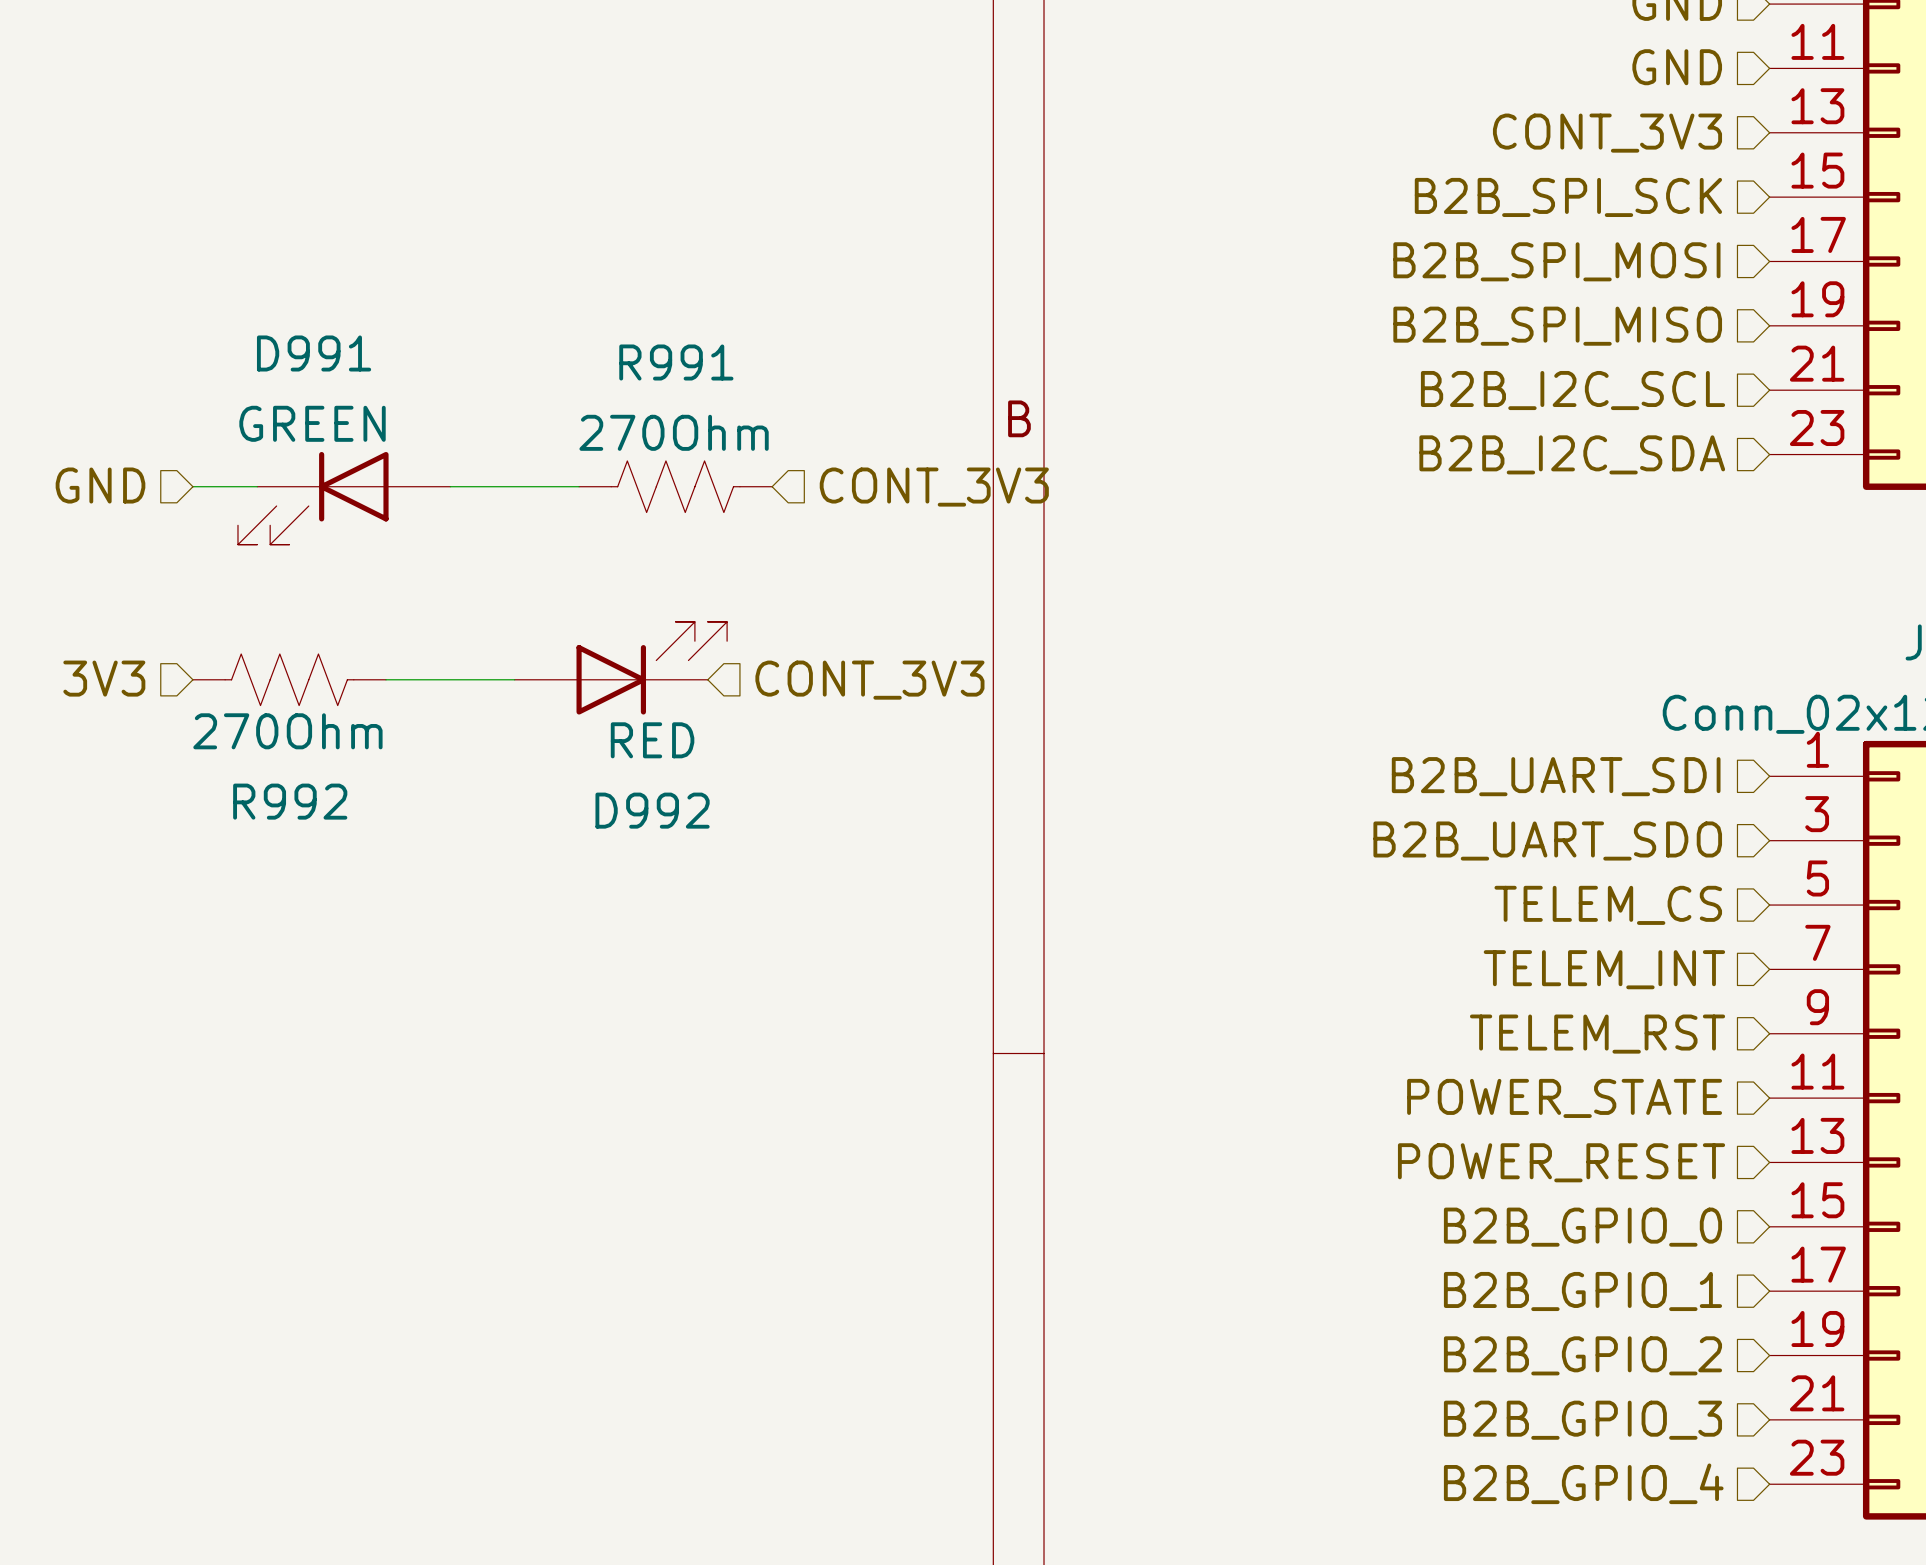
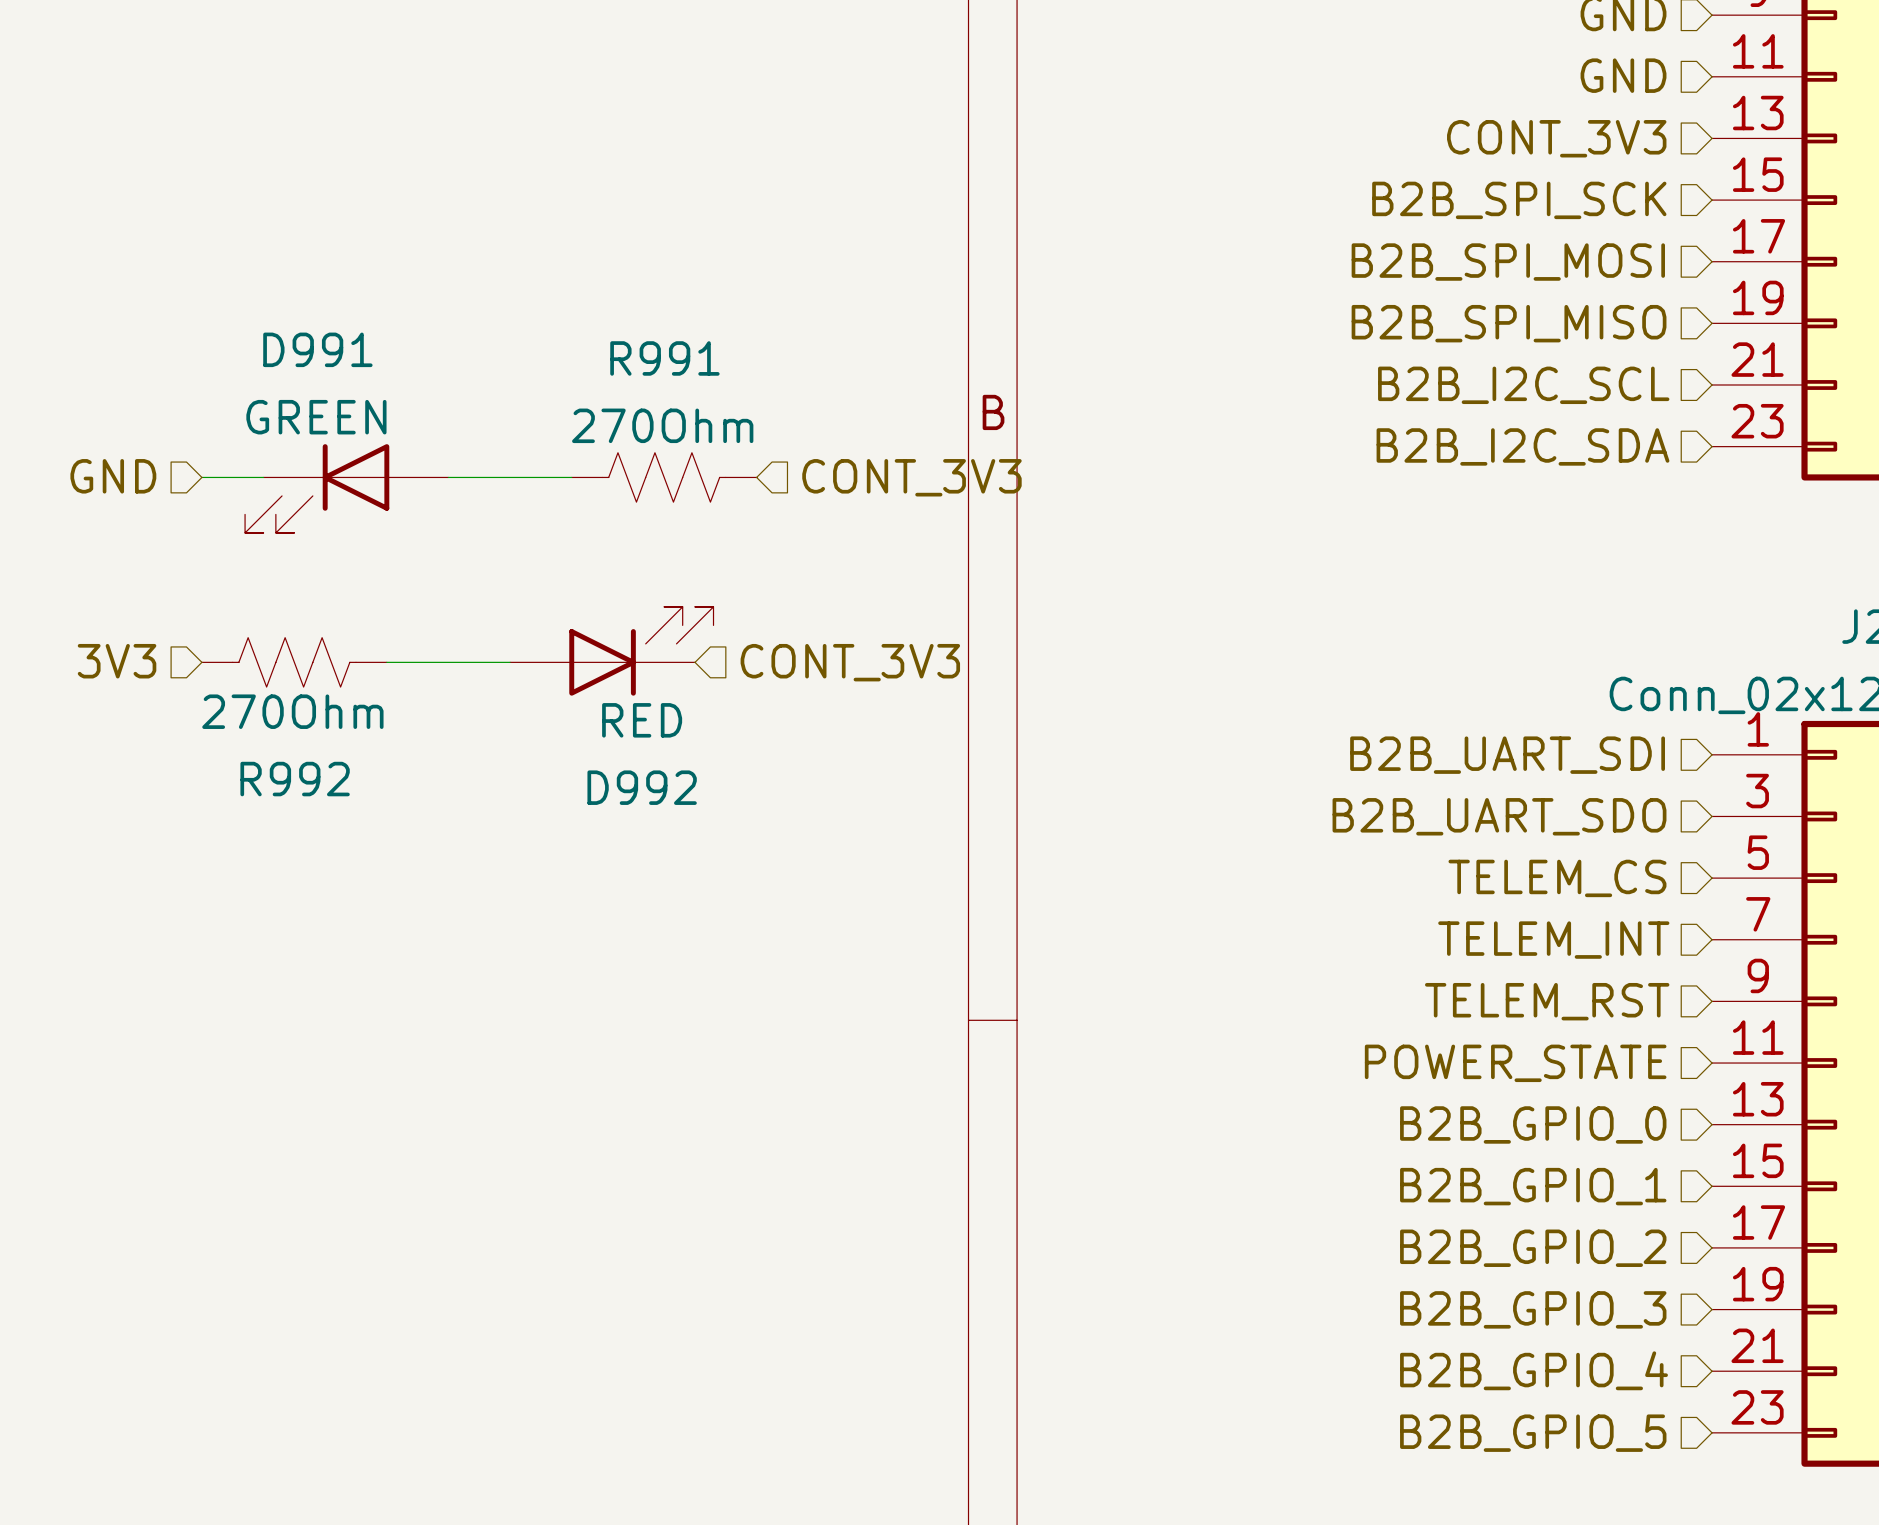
hierarchical label: POWER_RESET (1561, 1162) -> B2B_GPIO_0 (1533, 1124)
hierarchical label: B2B_GPIO_0 (1582, 1227) -> B2B_GPIO_1 (1533, 1186)
hierarchical label: B2B_GPIO_1 (1582, 1291) -> B2B_GPIO_2 (1533, 1248)
hierarchical label: B2B_GPIO_2 (1582, 1355) -> B2B_GPIO_3 (1533, 1309)
hierarchical label: B2B_GPIO_3 (1582, 1420) -> B2B_GPIO_4 (1533, 1370)
hierarchical label: B2B_GPIO_4 (1583, 1483) -> B2B_GPIO_5 (1533, 1433)

